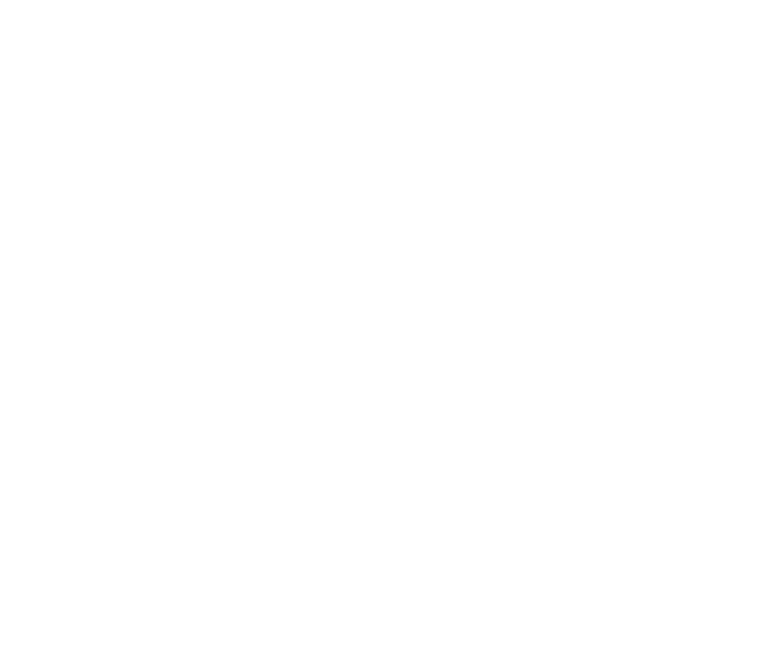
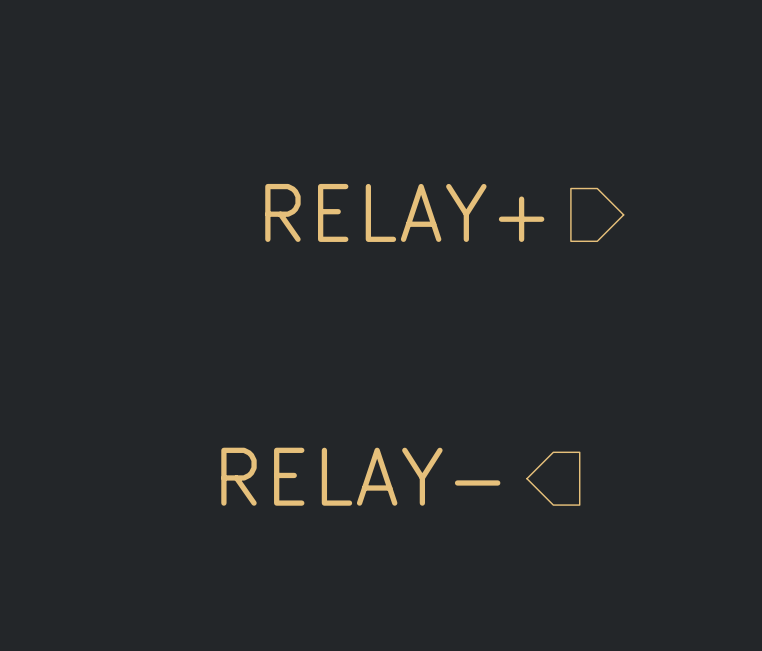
hierarchical label: none -> RELAY+ (404, 212)
hierarchical label: none -> RELAY- (360, 476)

